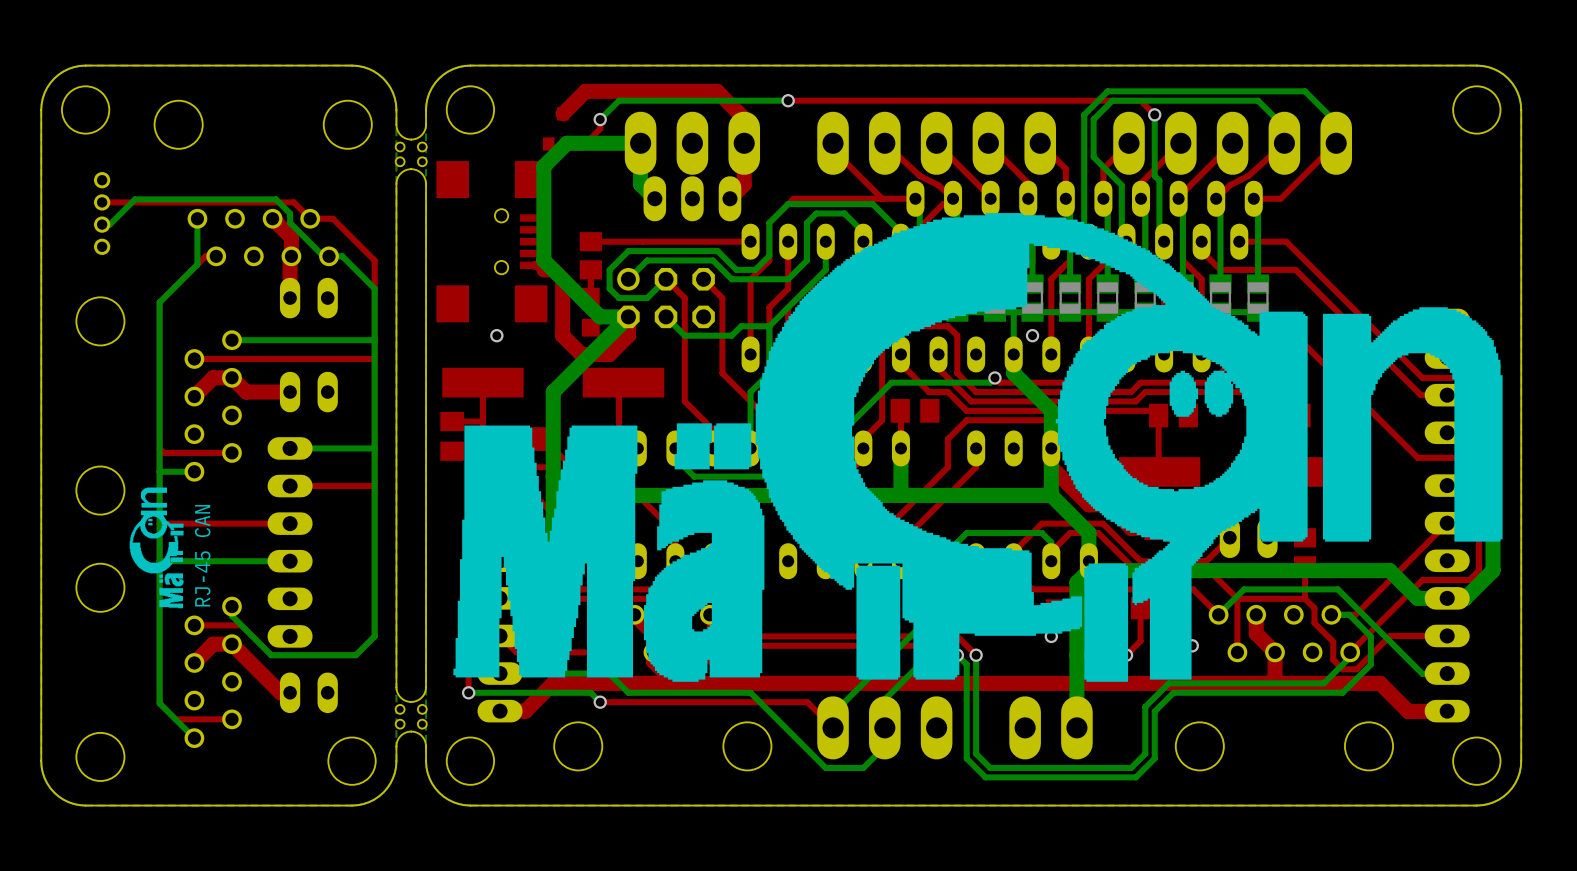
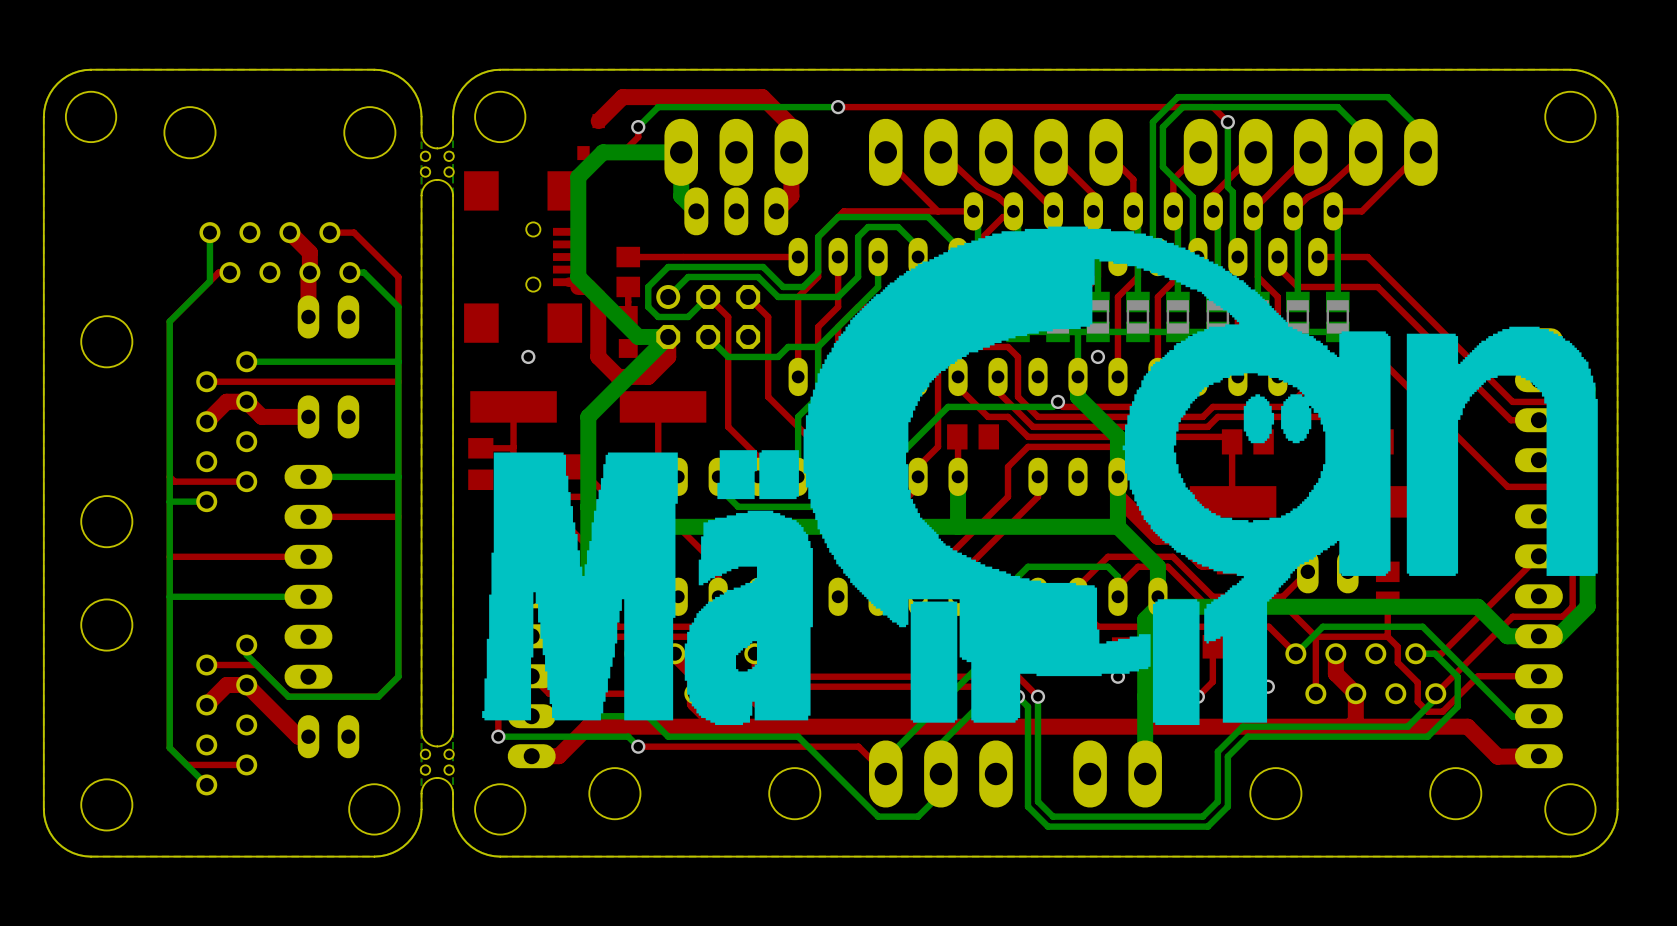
top track: (102, 202) (293, 202) (310, 218) -> none
part: (102, 213) -> none
bottom track: (102, 224) (109, 224) (135, 199) (275, 199) (290, 213) (290, 222) (323, 256) (329, 256) -> none
drawing: [129, 487, 184, 609] -> none
text: RJ-45 CAN (202, 555) -> none

